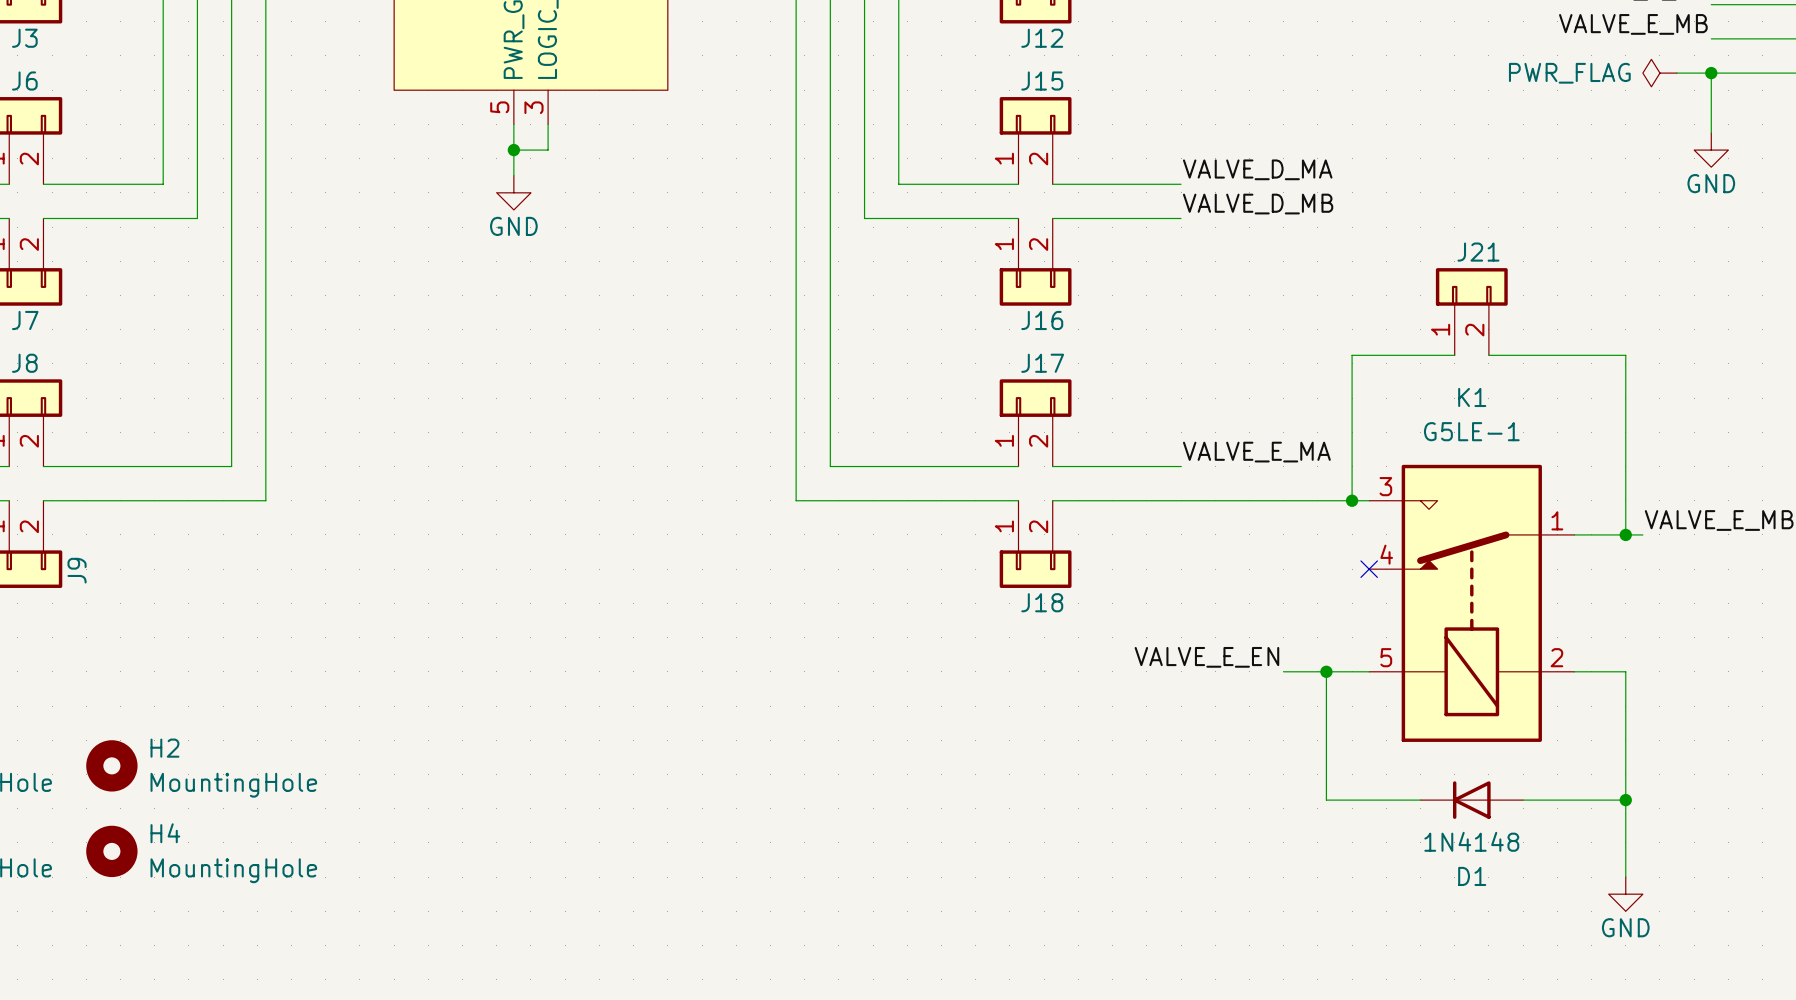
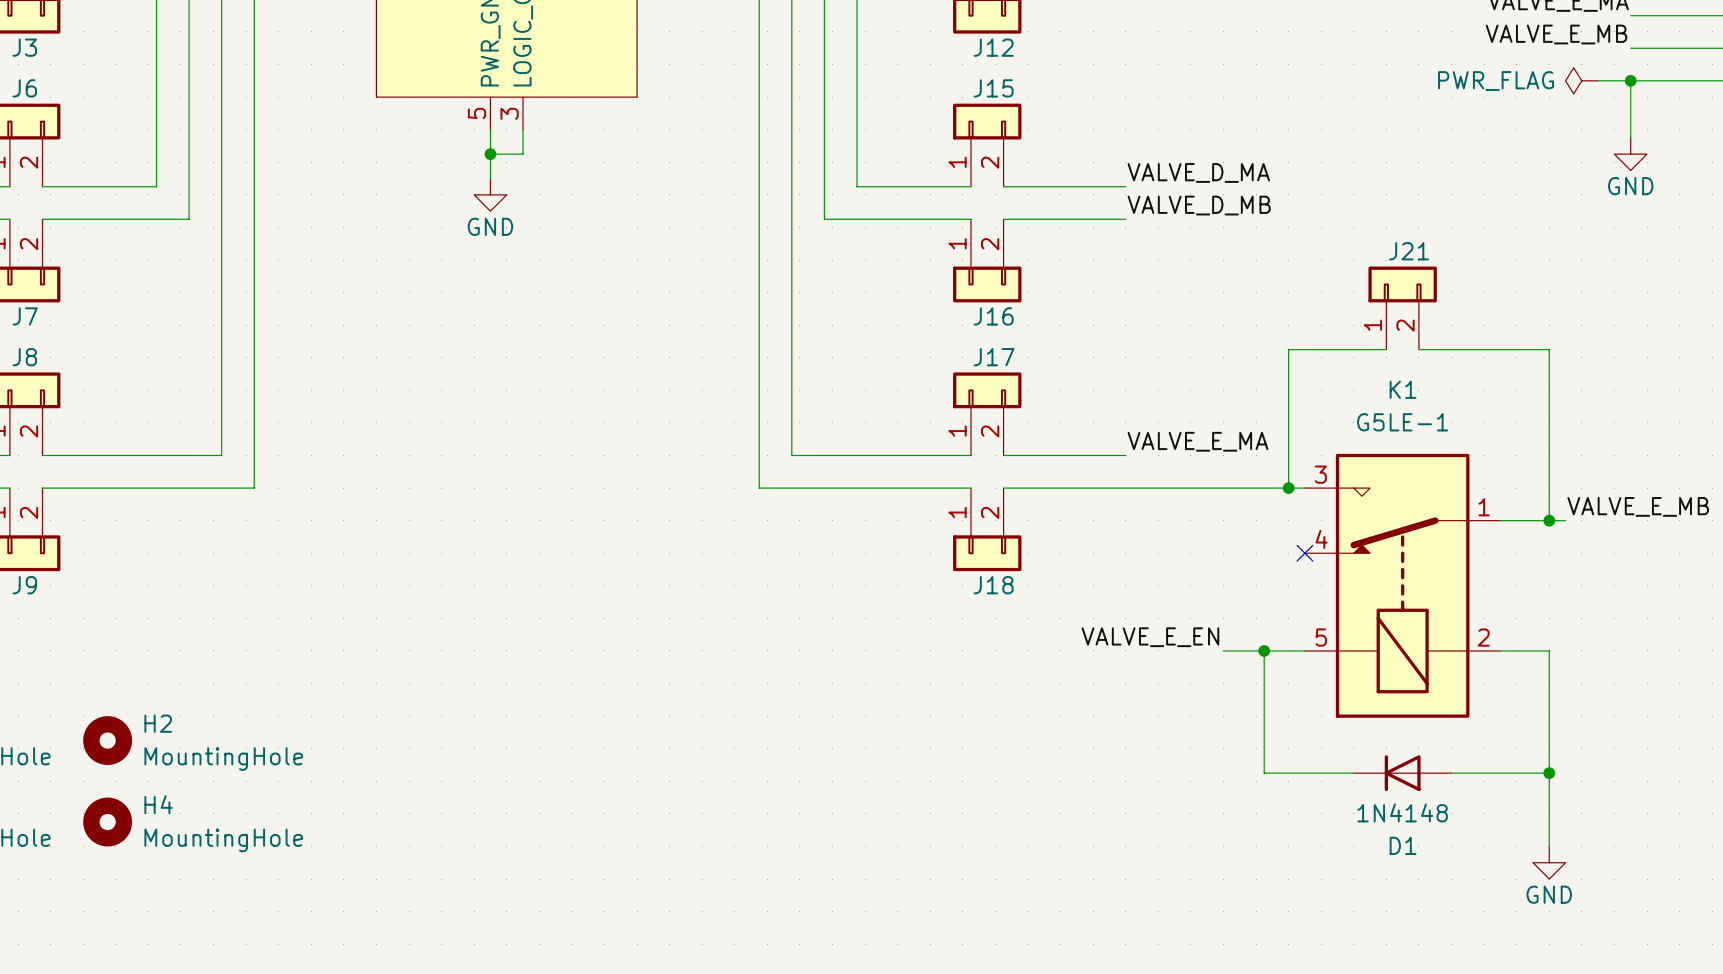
J9 name rotation: 0° (77, 570) -> 90° clockwise (24, 585)
J9 name position: J9 (77, 570) -> J9 (24, 585)

